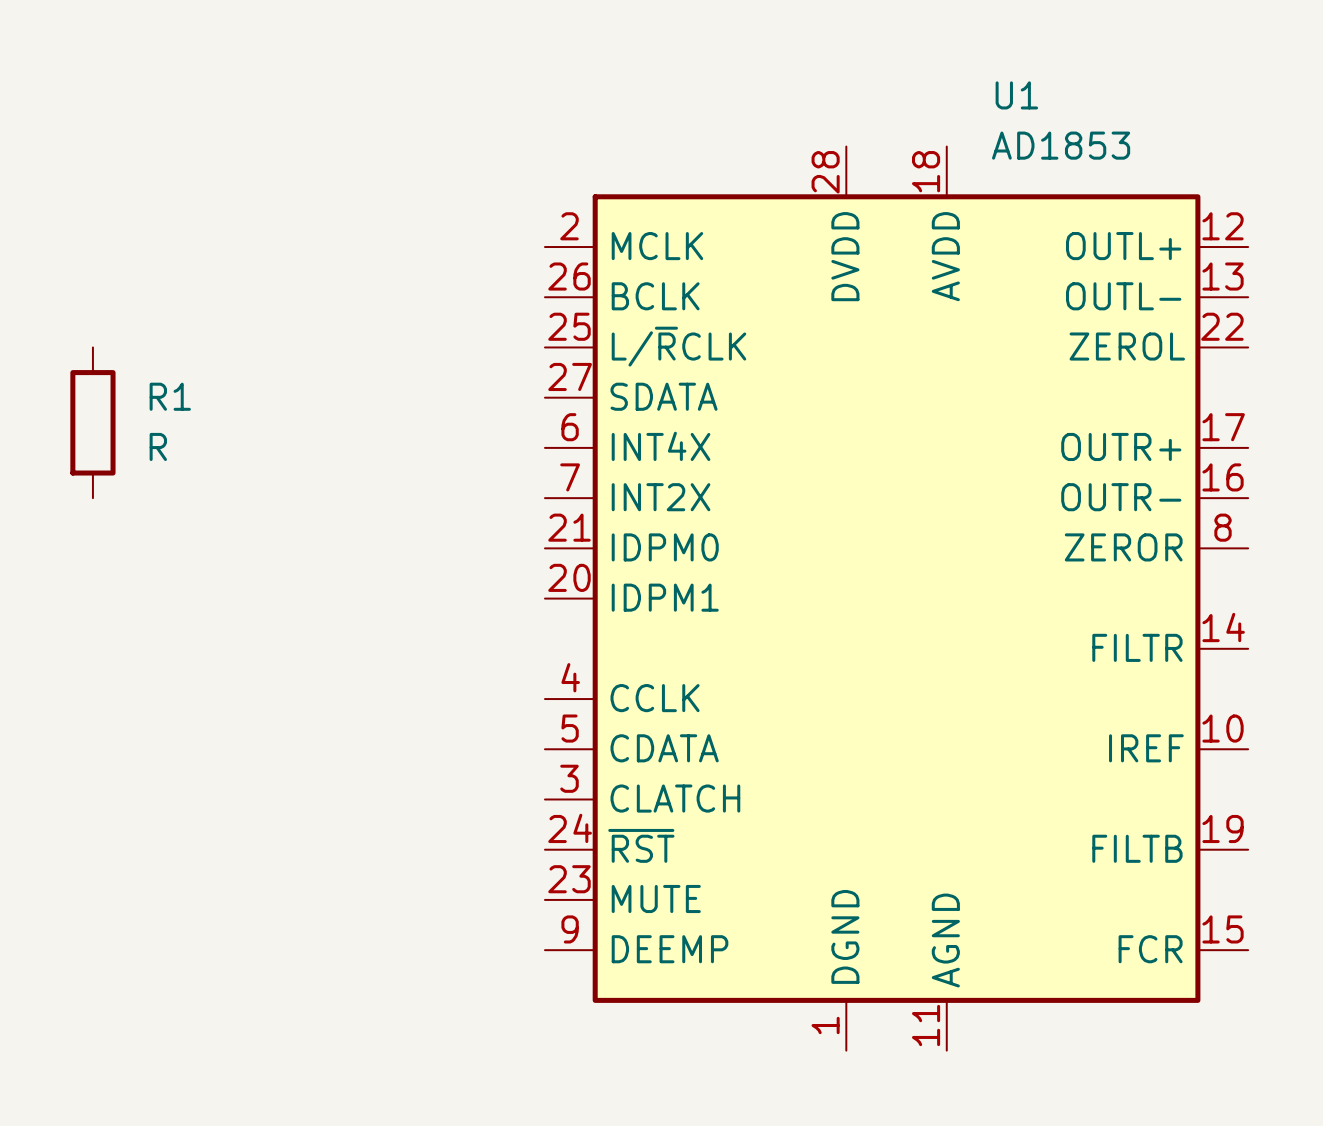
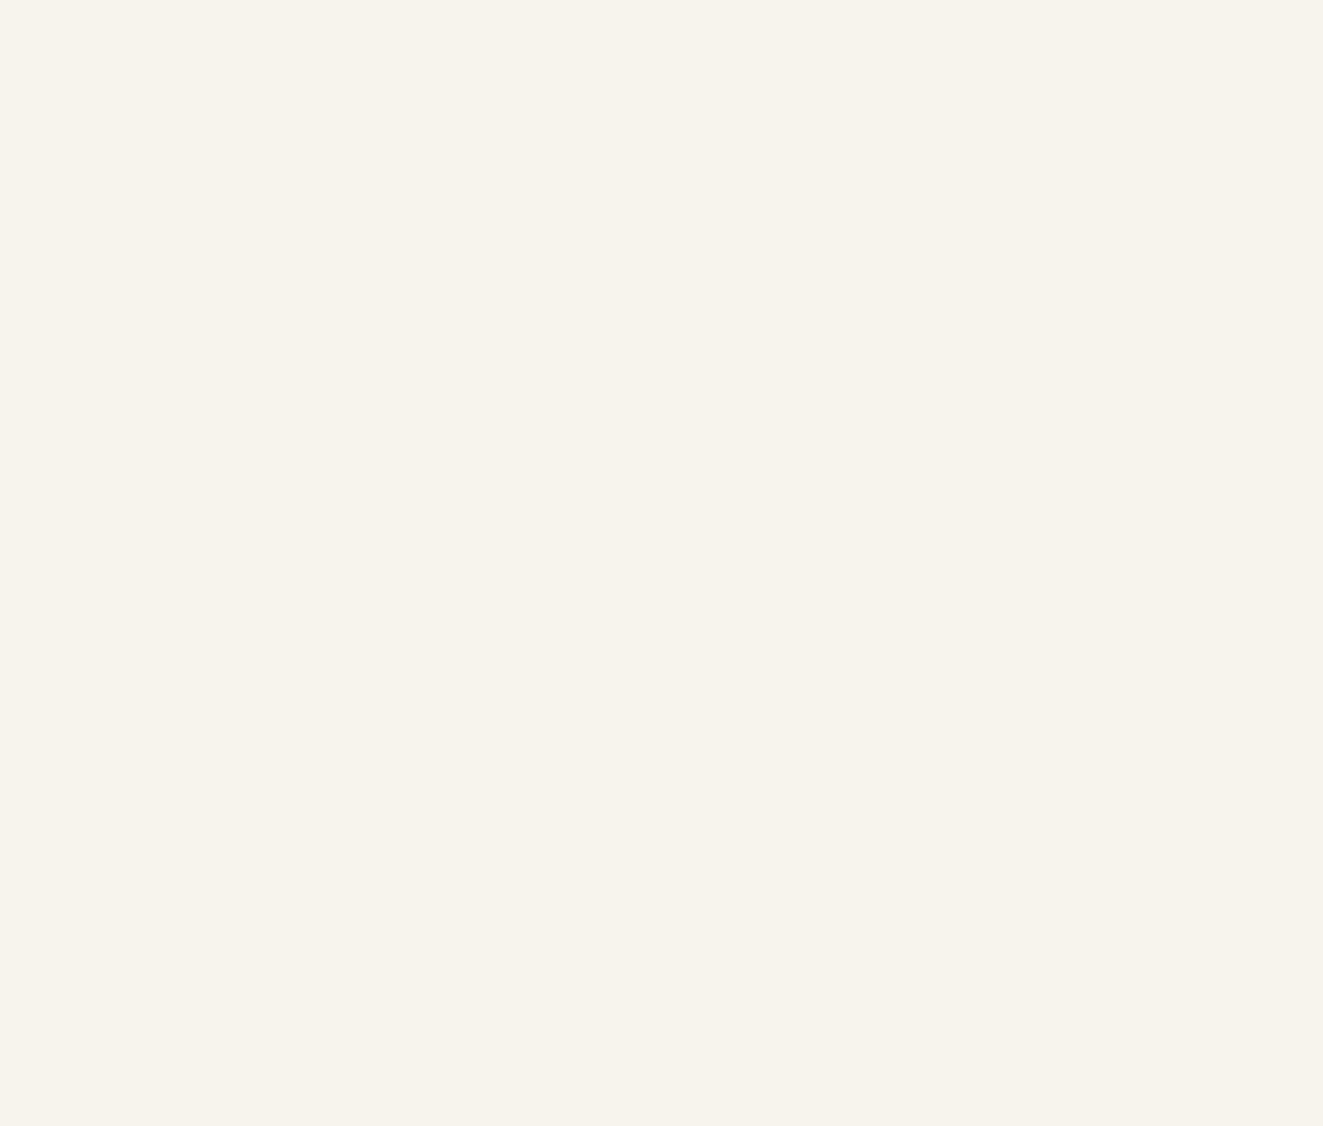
R1: R (92, 422) -> none
U1: AD1853 (896, 598) -> none

